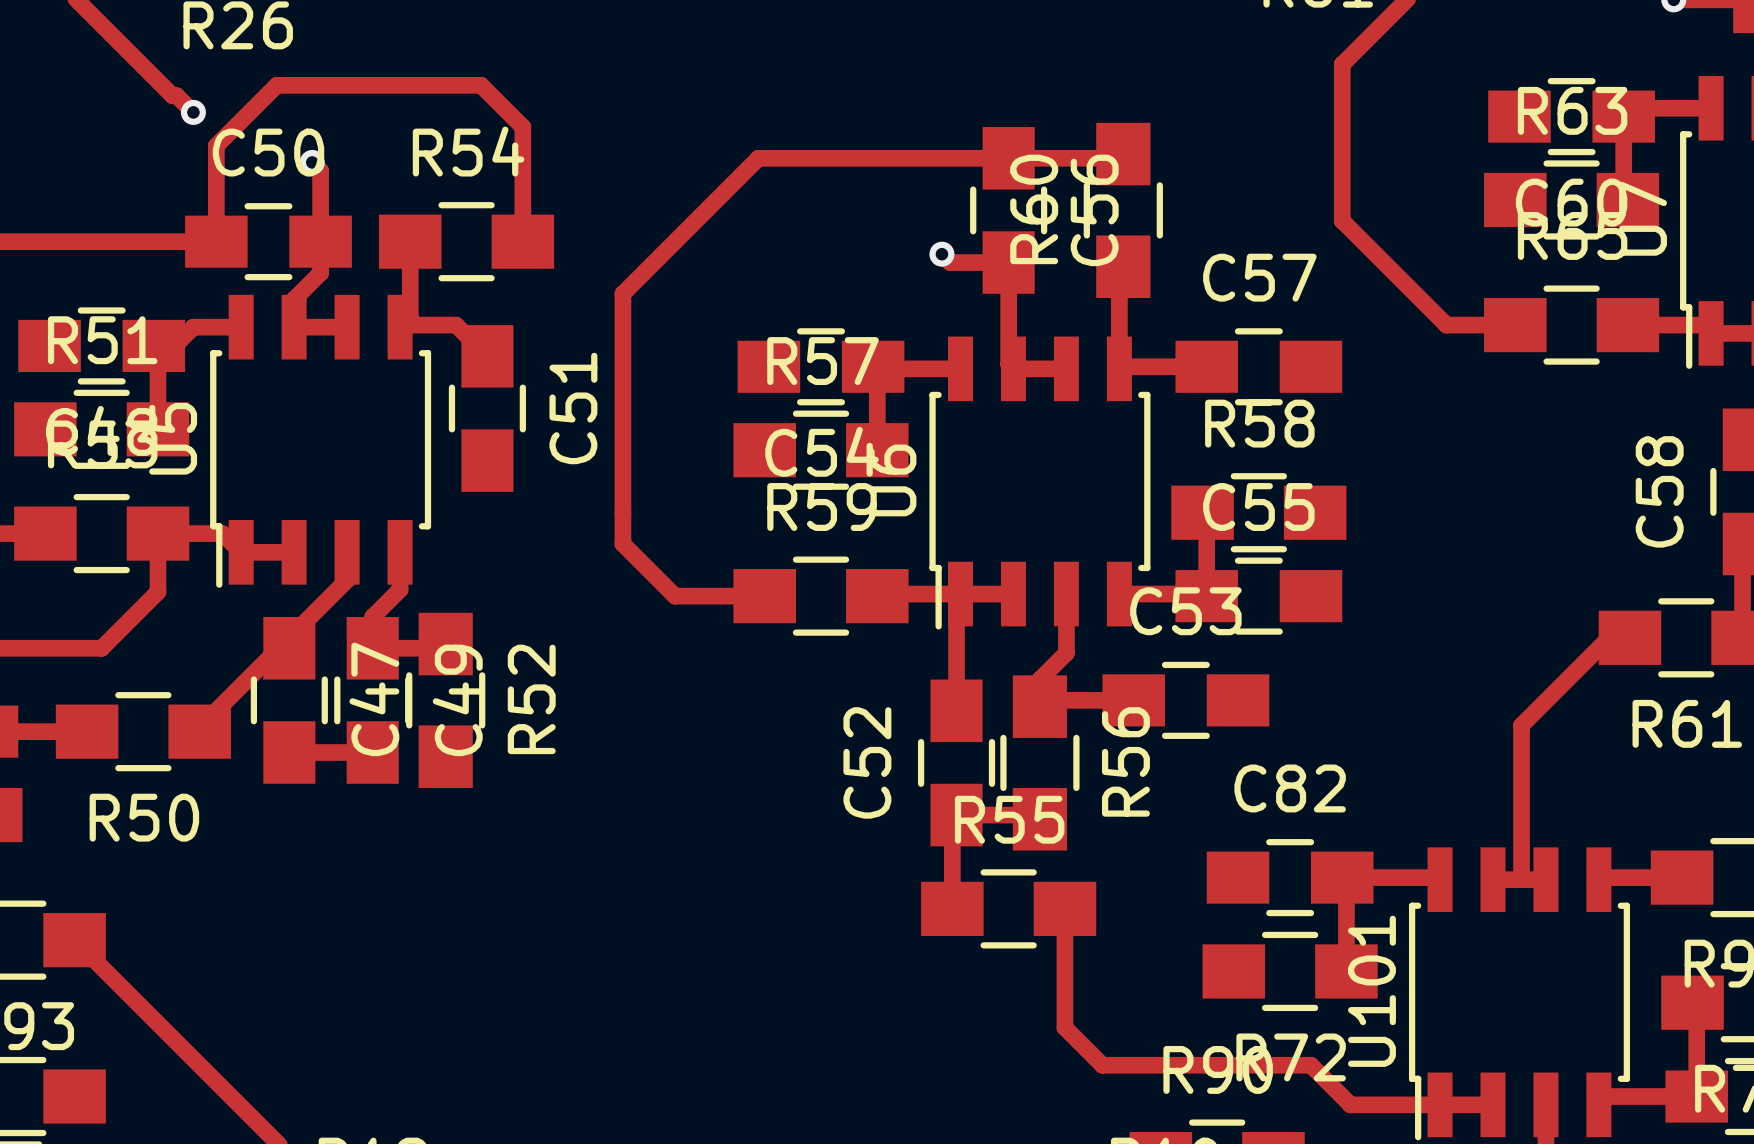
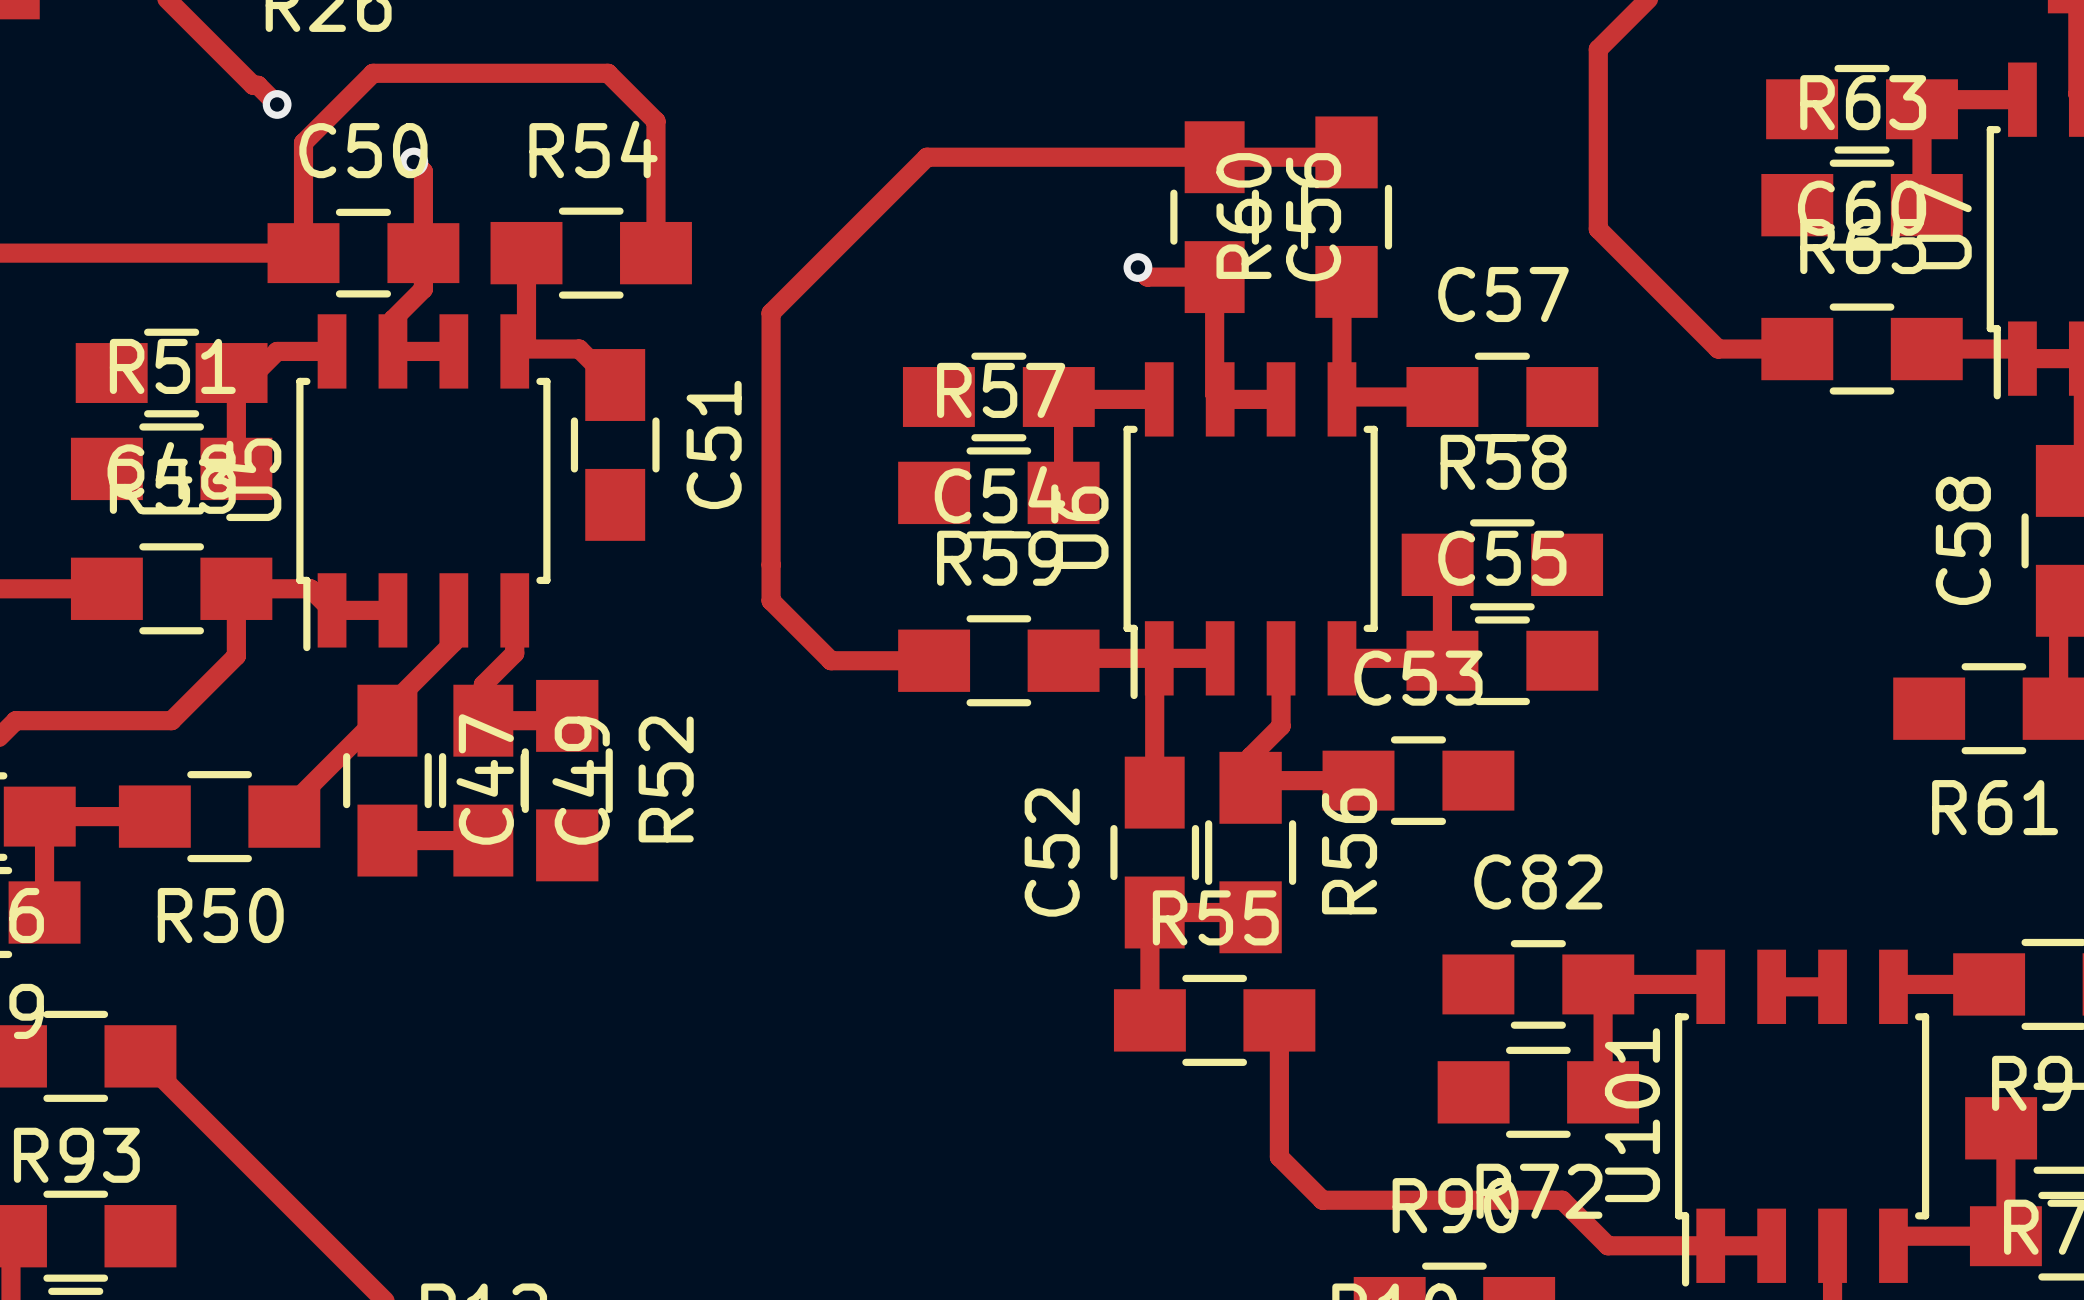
top track: (1629, 637) (1609, 637) (1521, 725) (1521, 879) -> none

